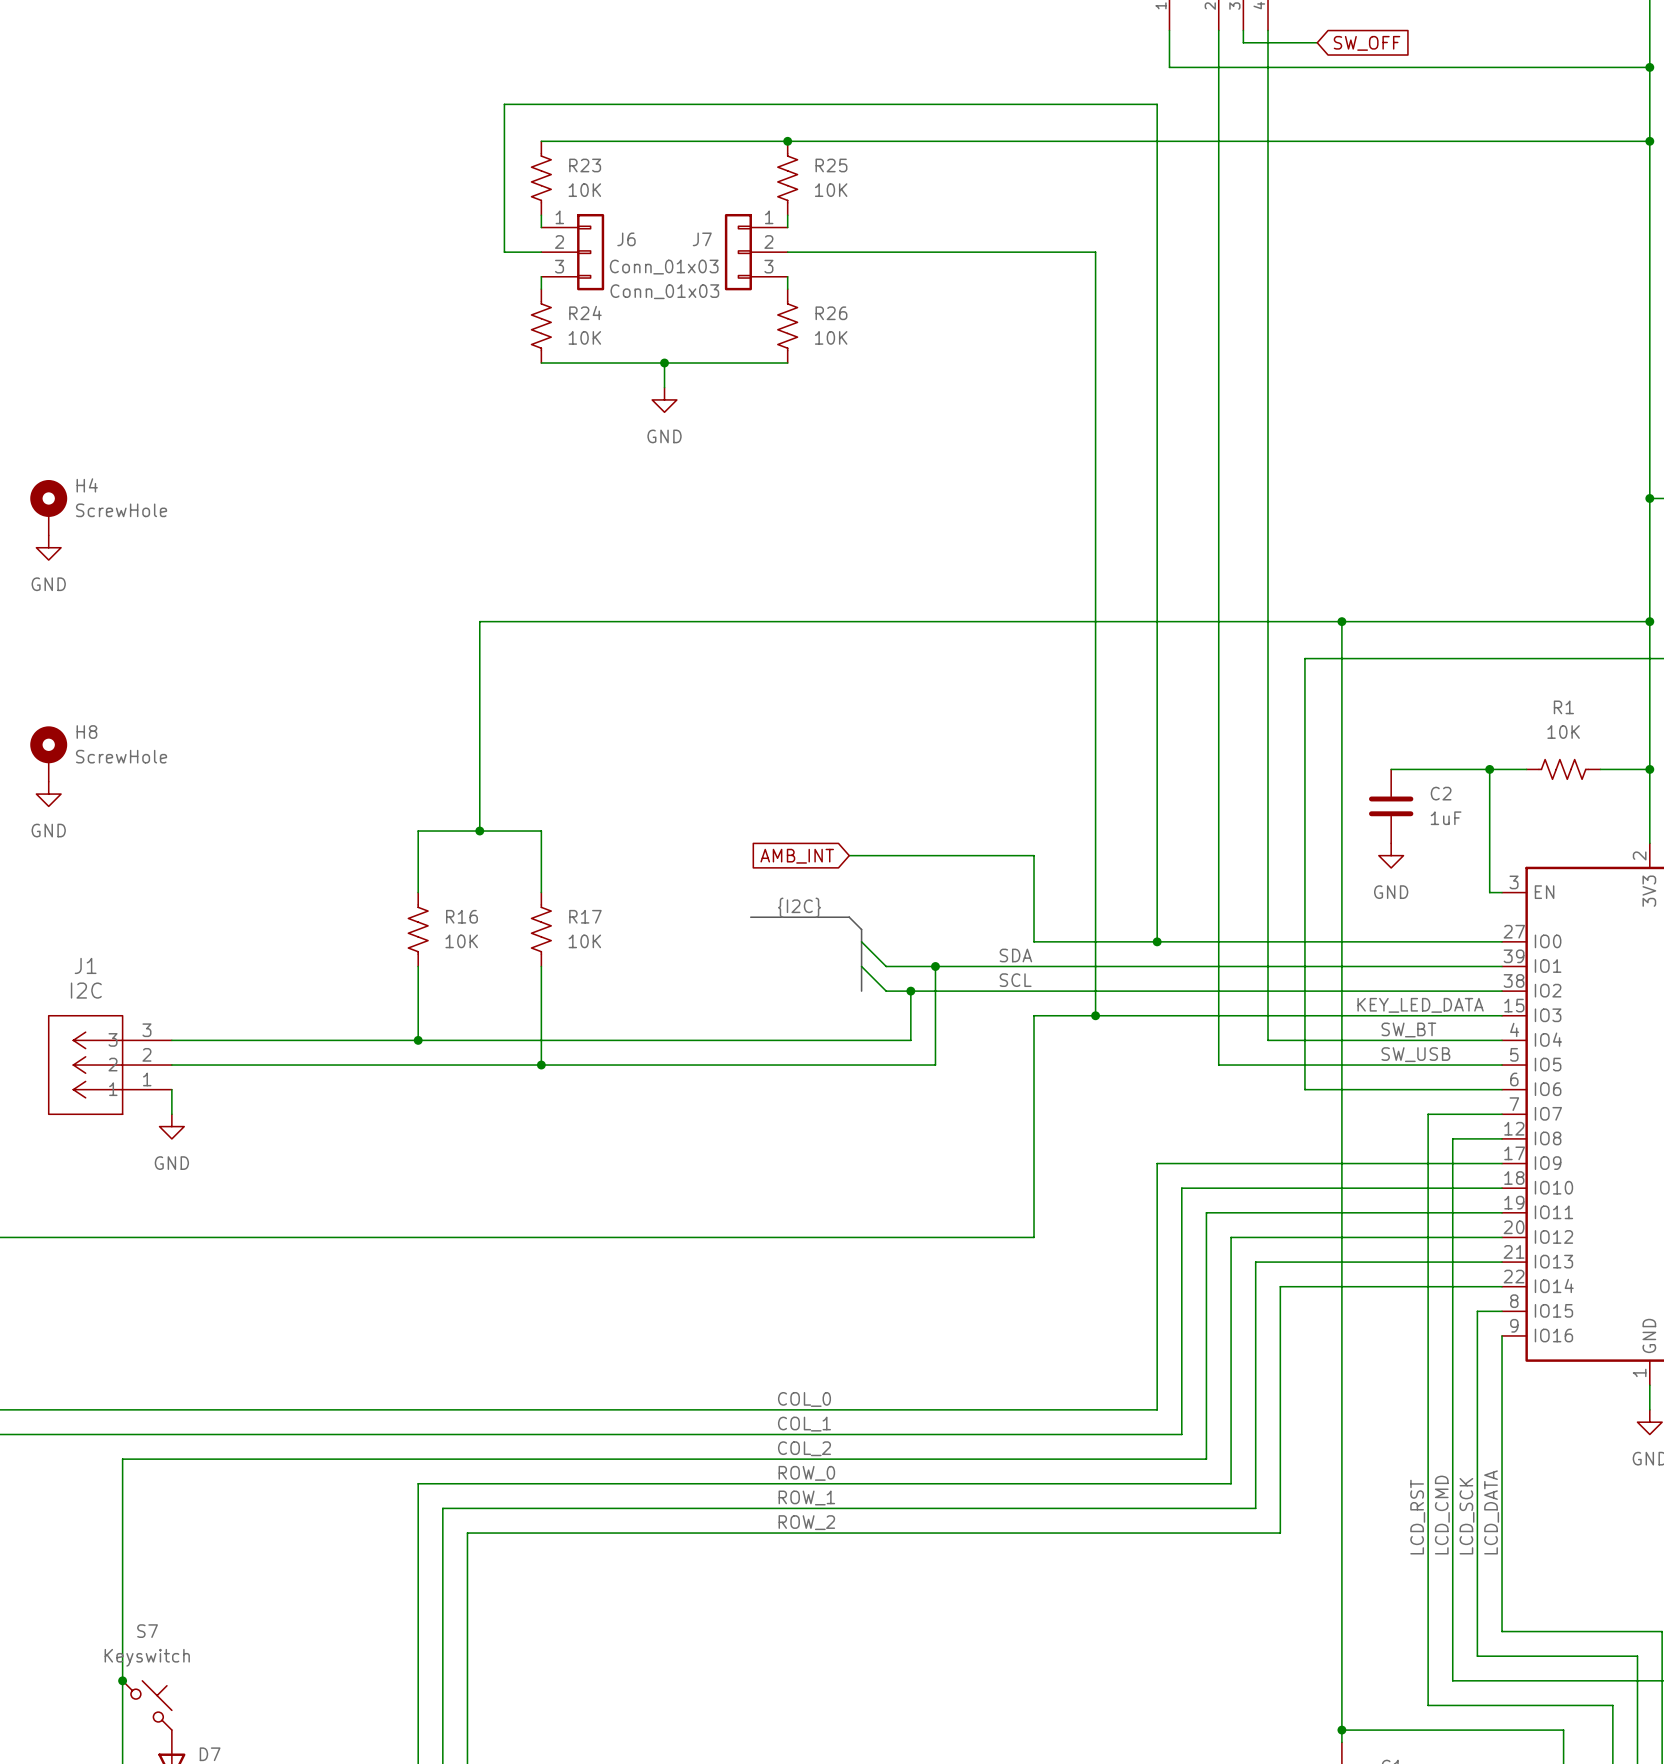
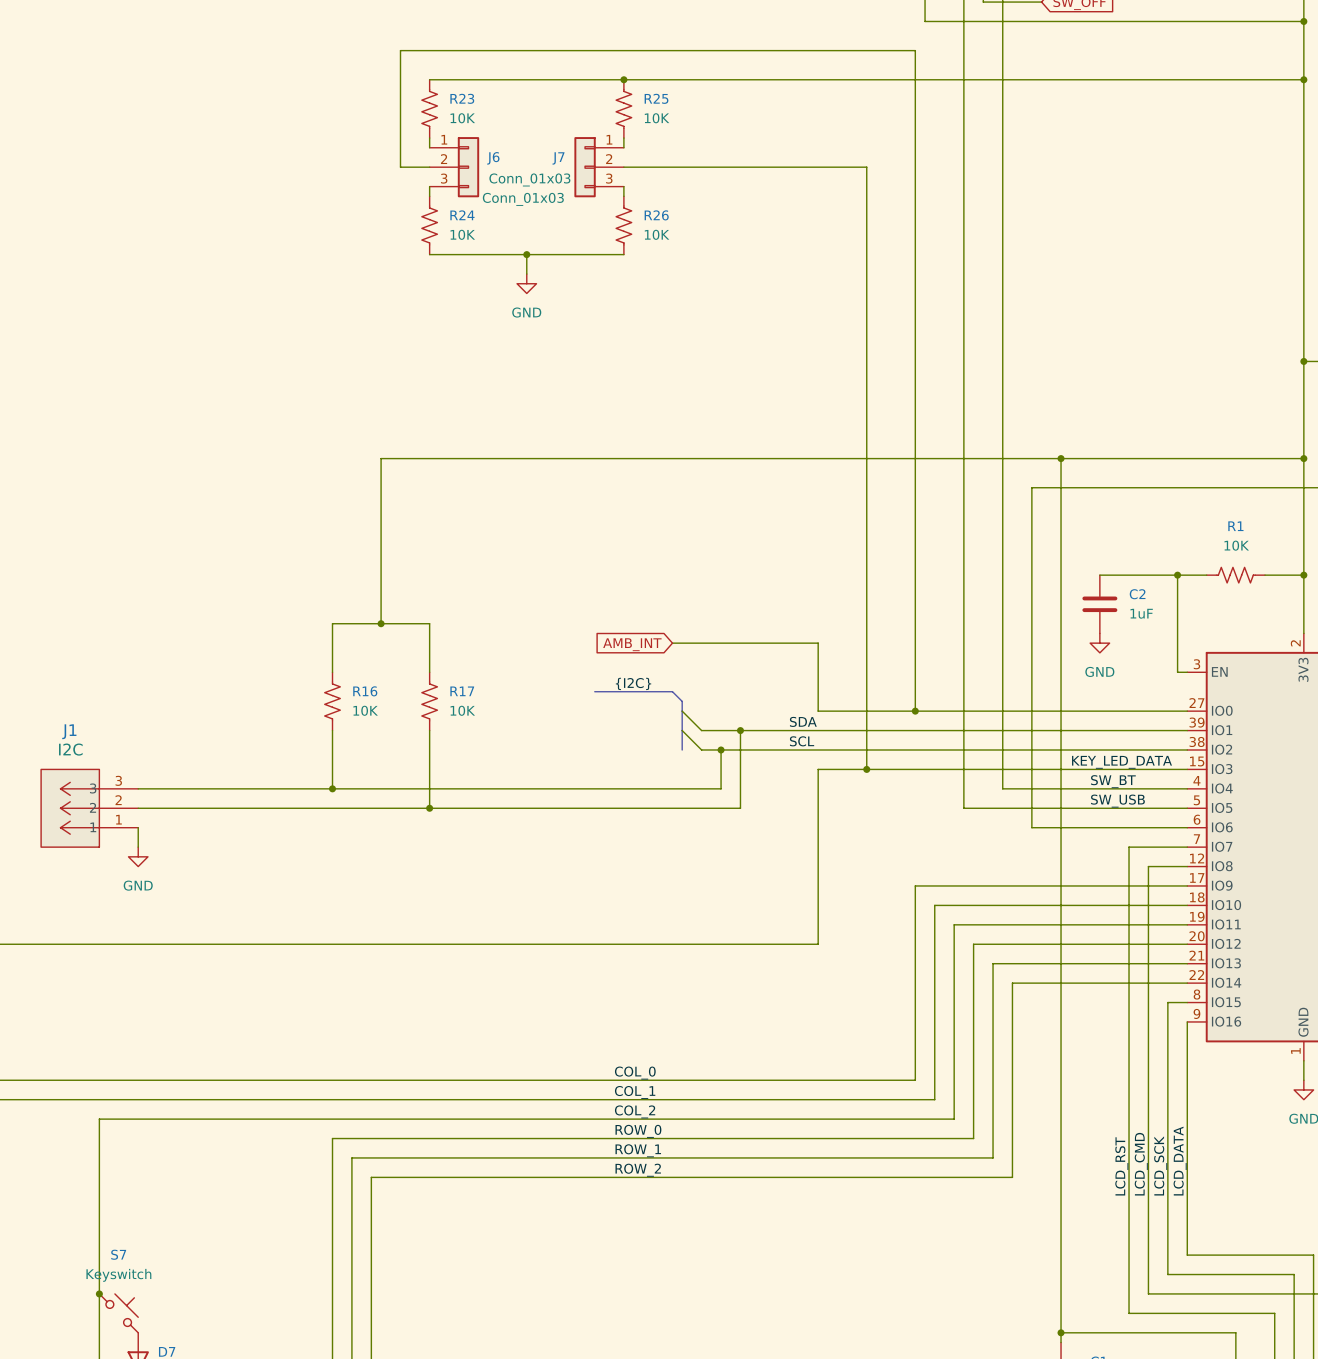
H4: ScrewHole (48, 507) -> none
power symbol: GND (48, 547) -> none
H8: ScrewHole (48, 754) -> none
power symbol: GND (48, 794) -> none

